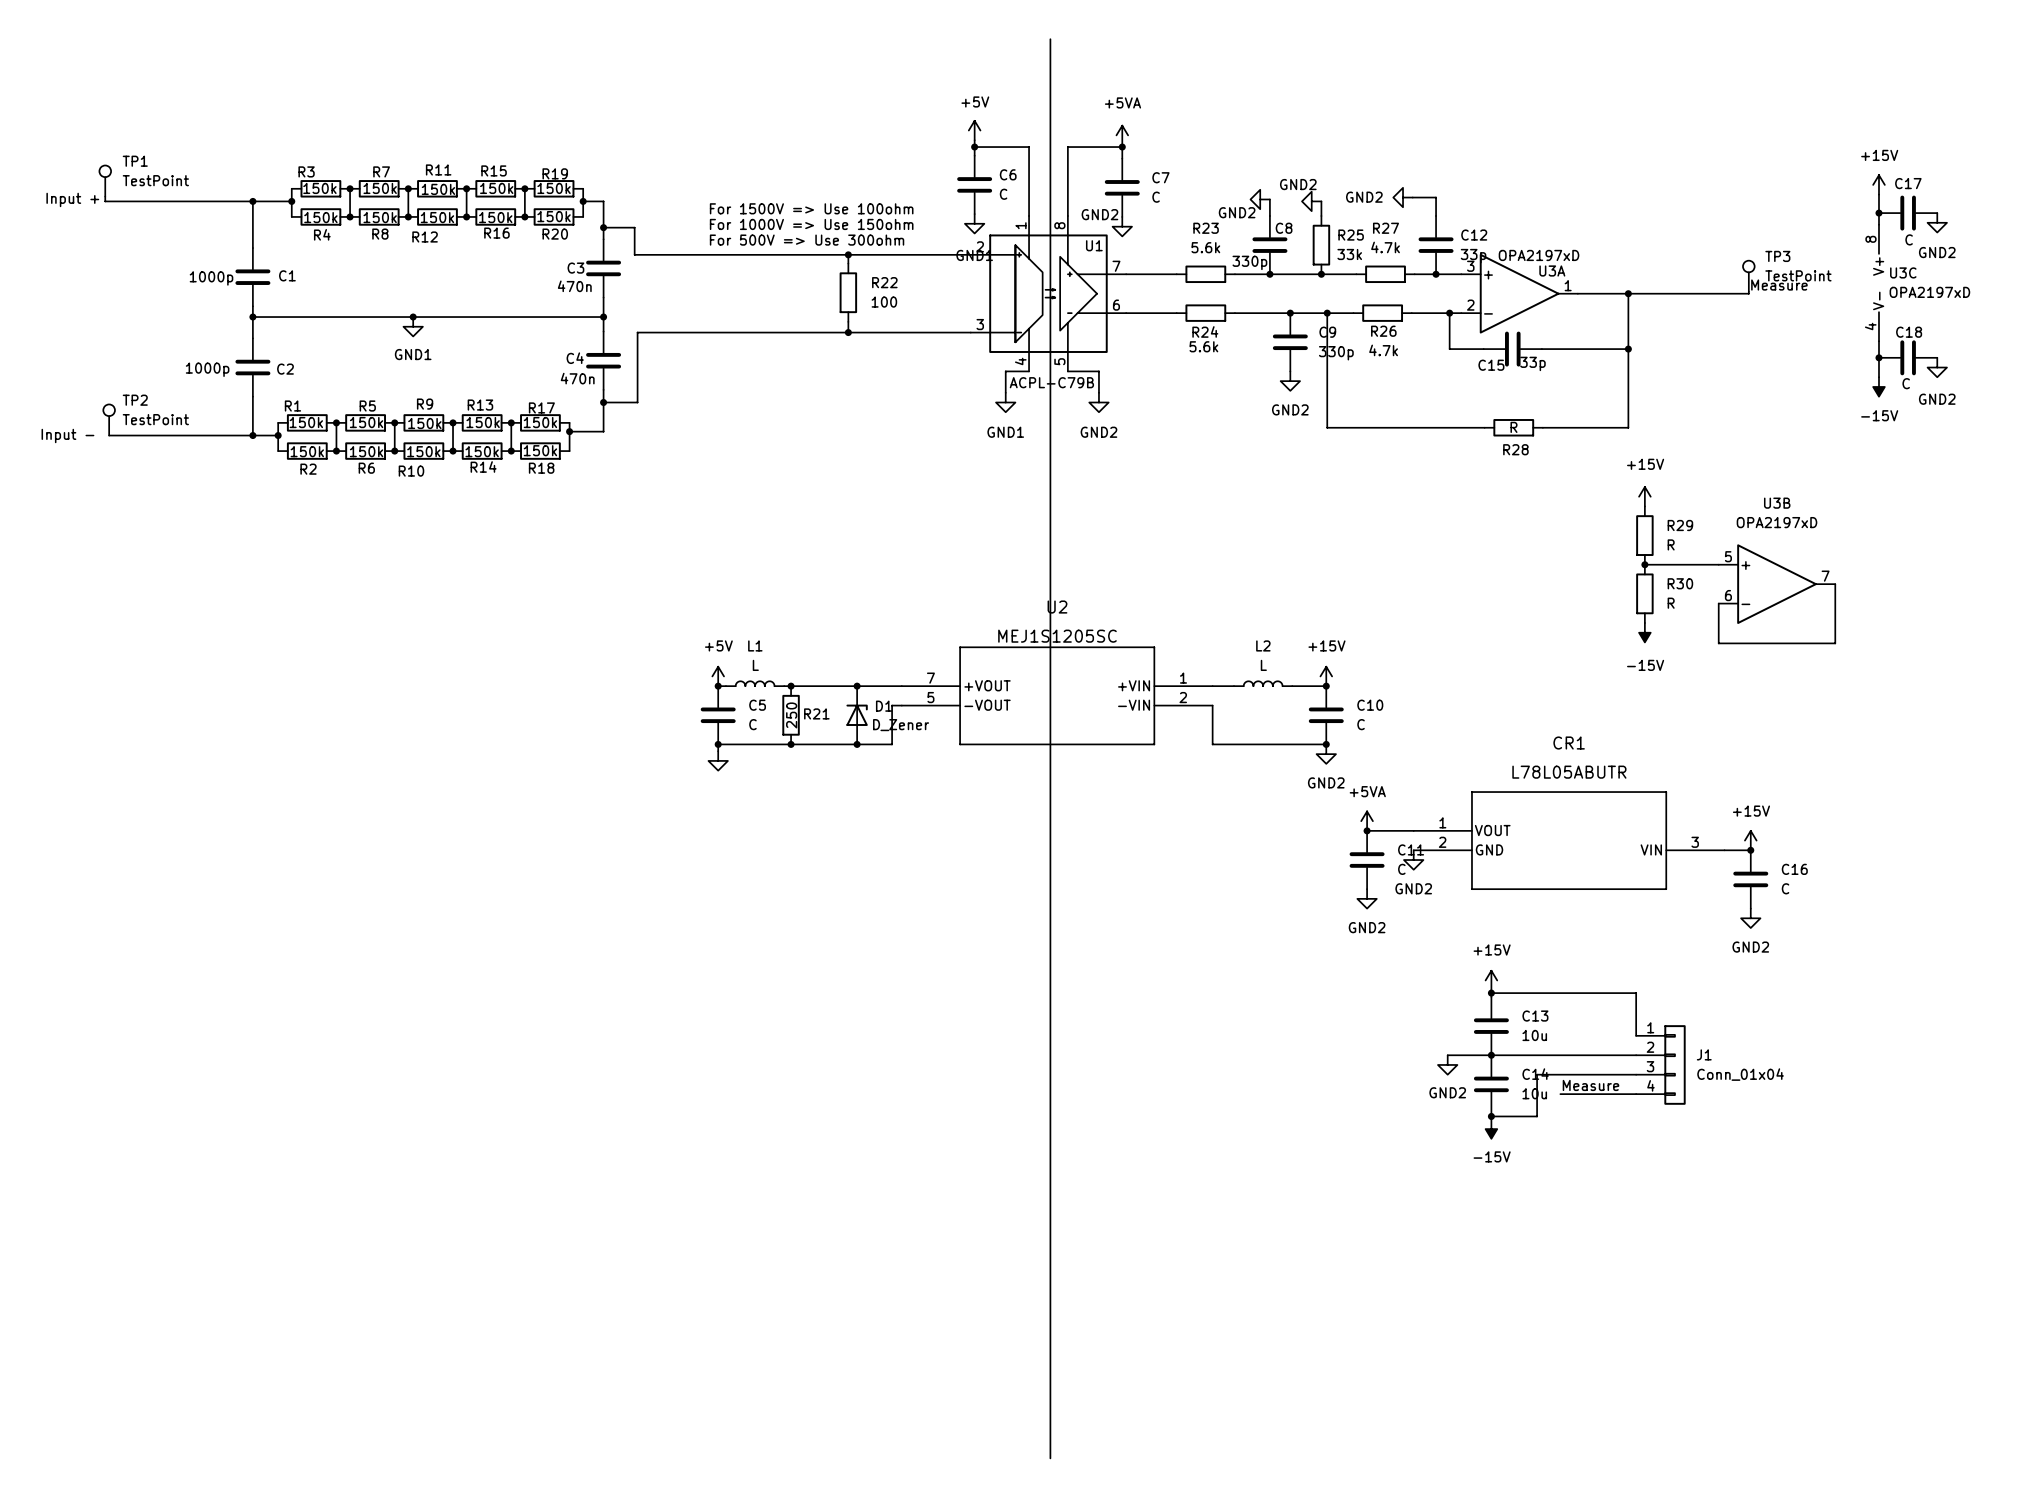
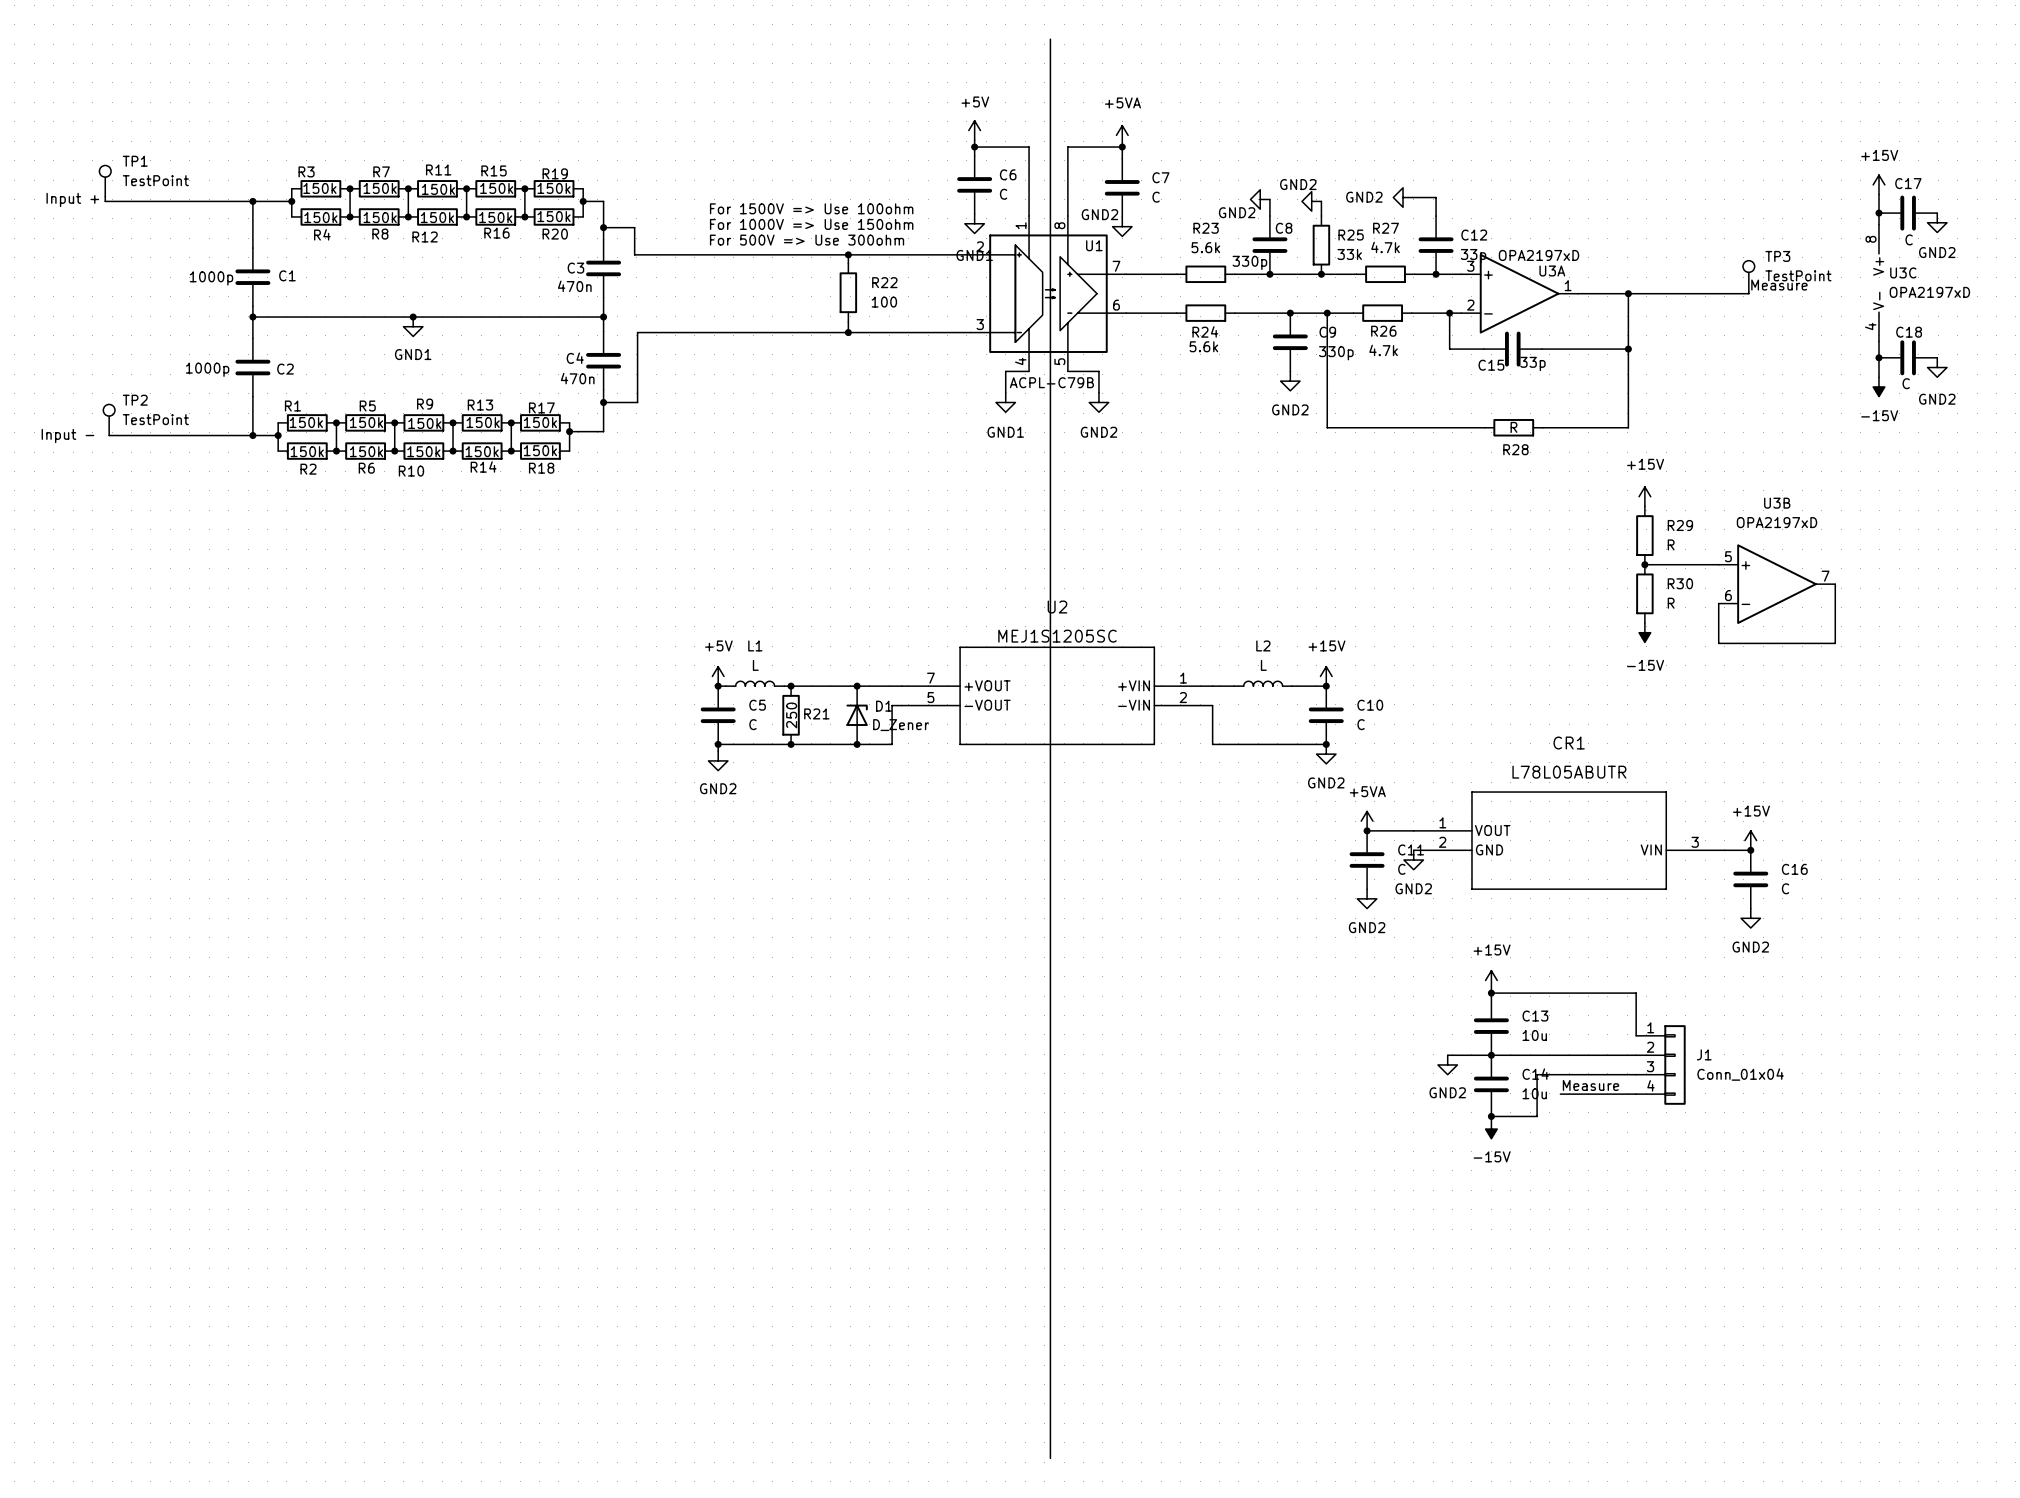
power symbol text: none -> GND2 (718, 788)

